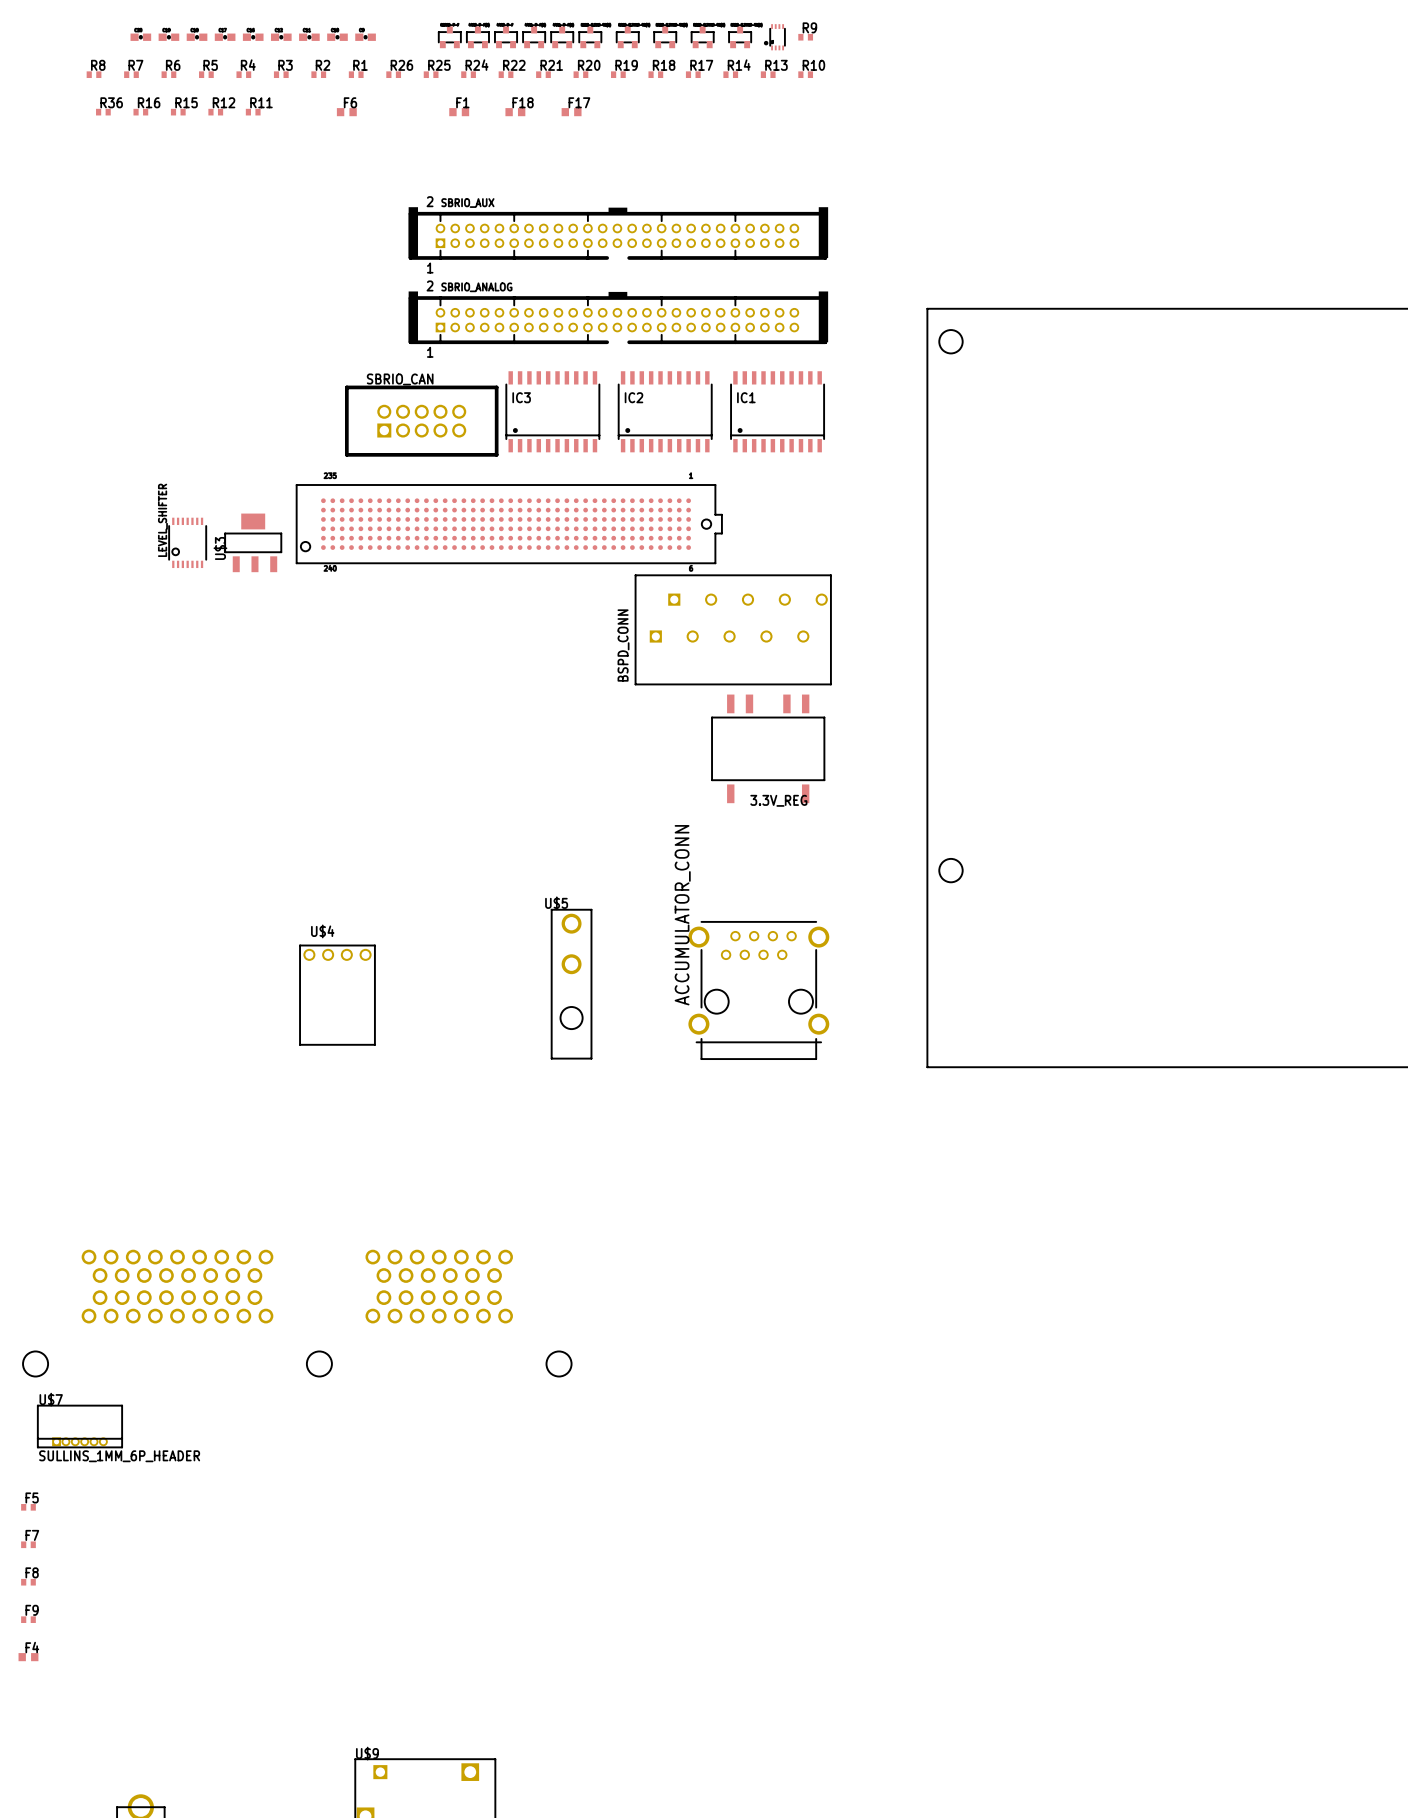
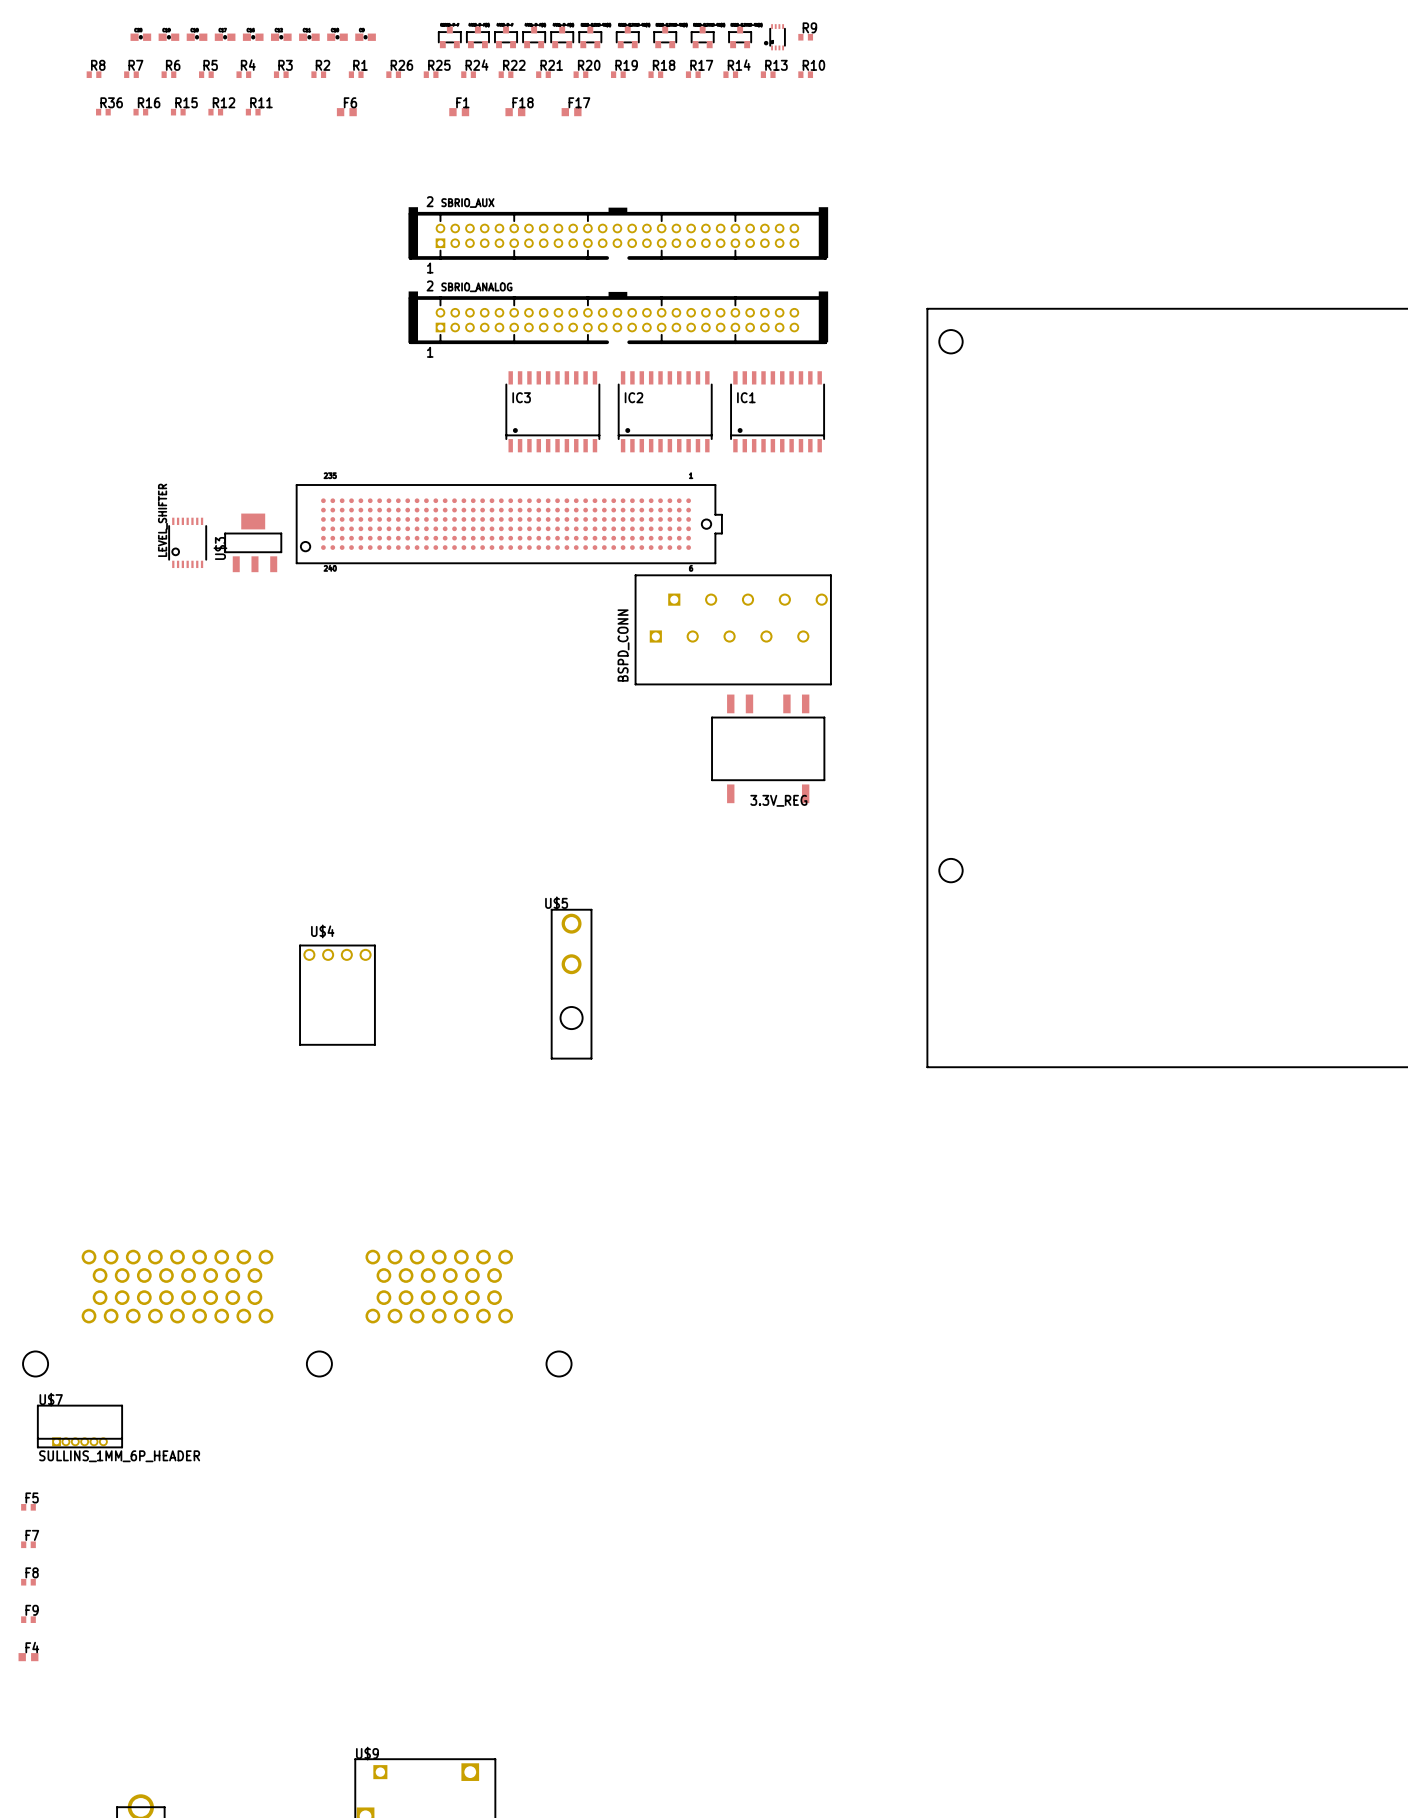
SBRIO_CAN: (421, 421) -> none
ACCUMULATOR_CONN: (758, 990) -> none

